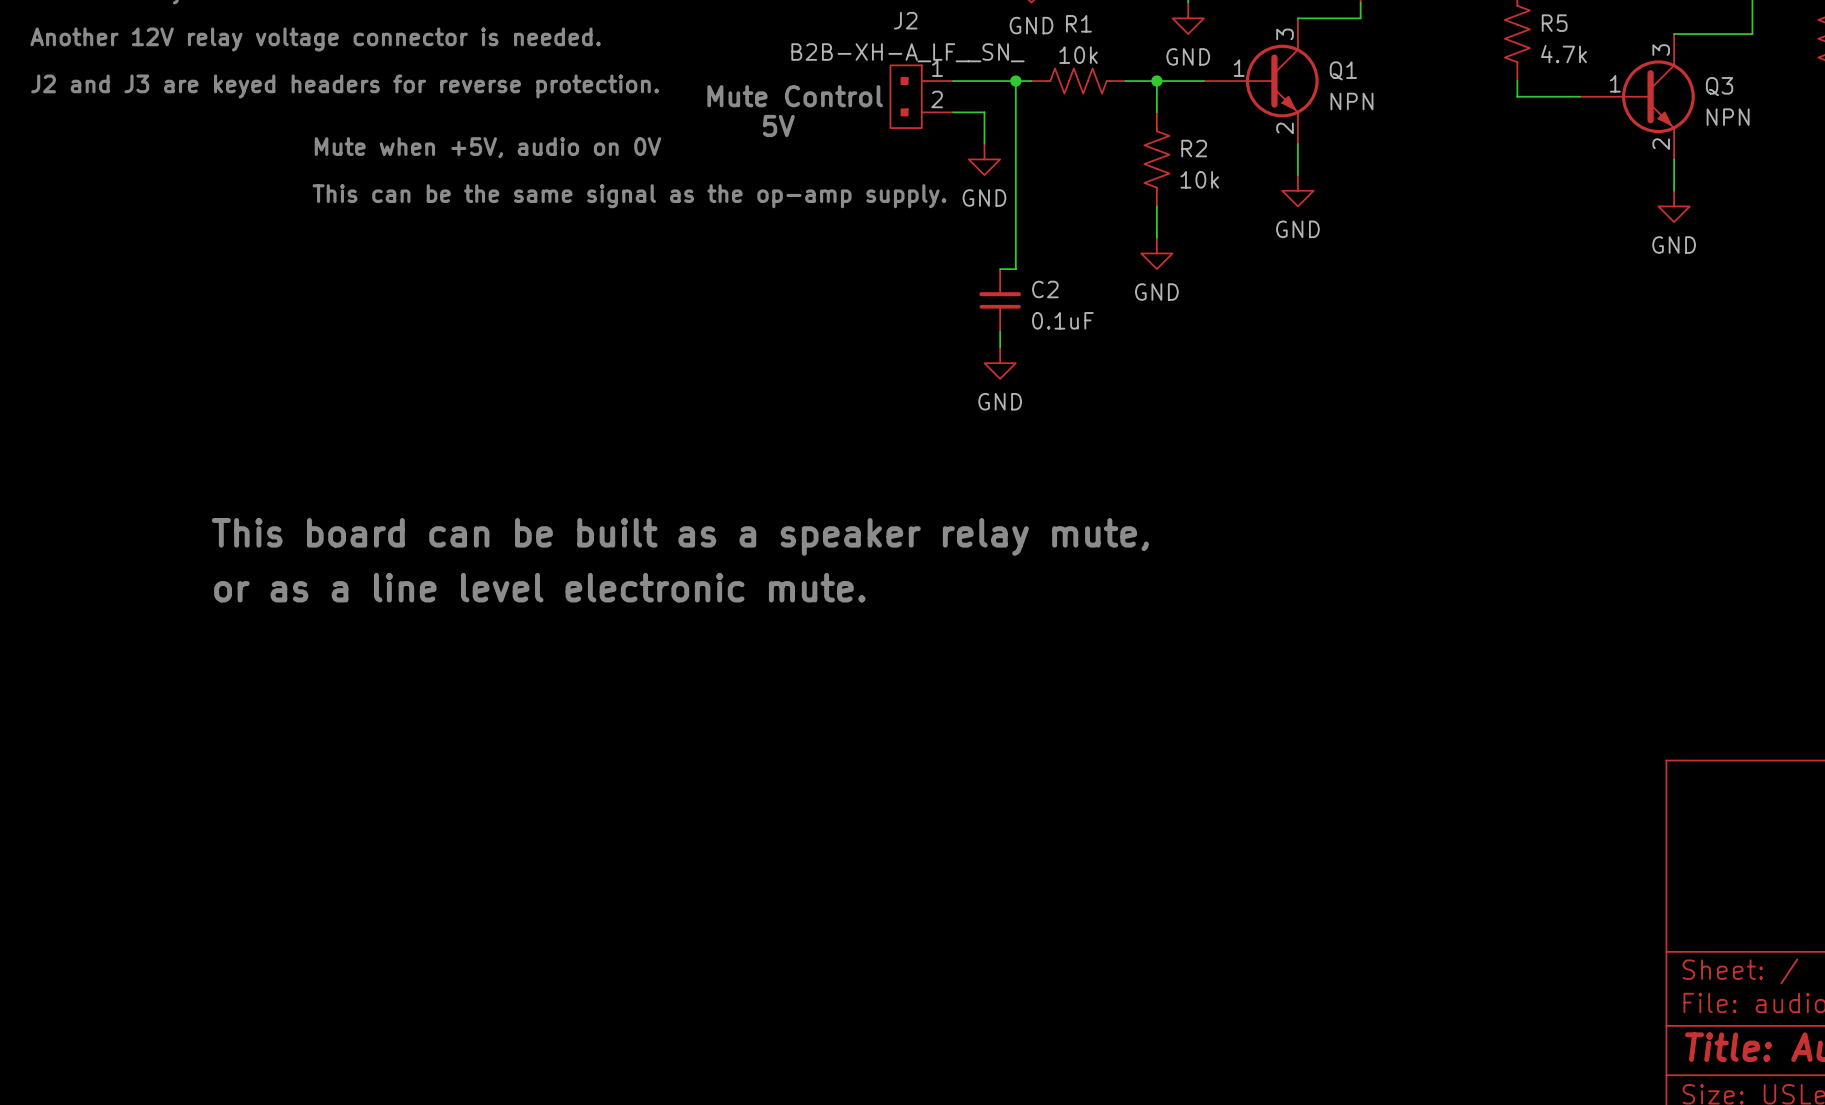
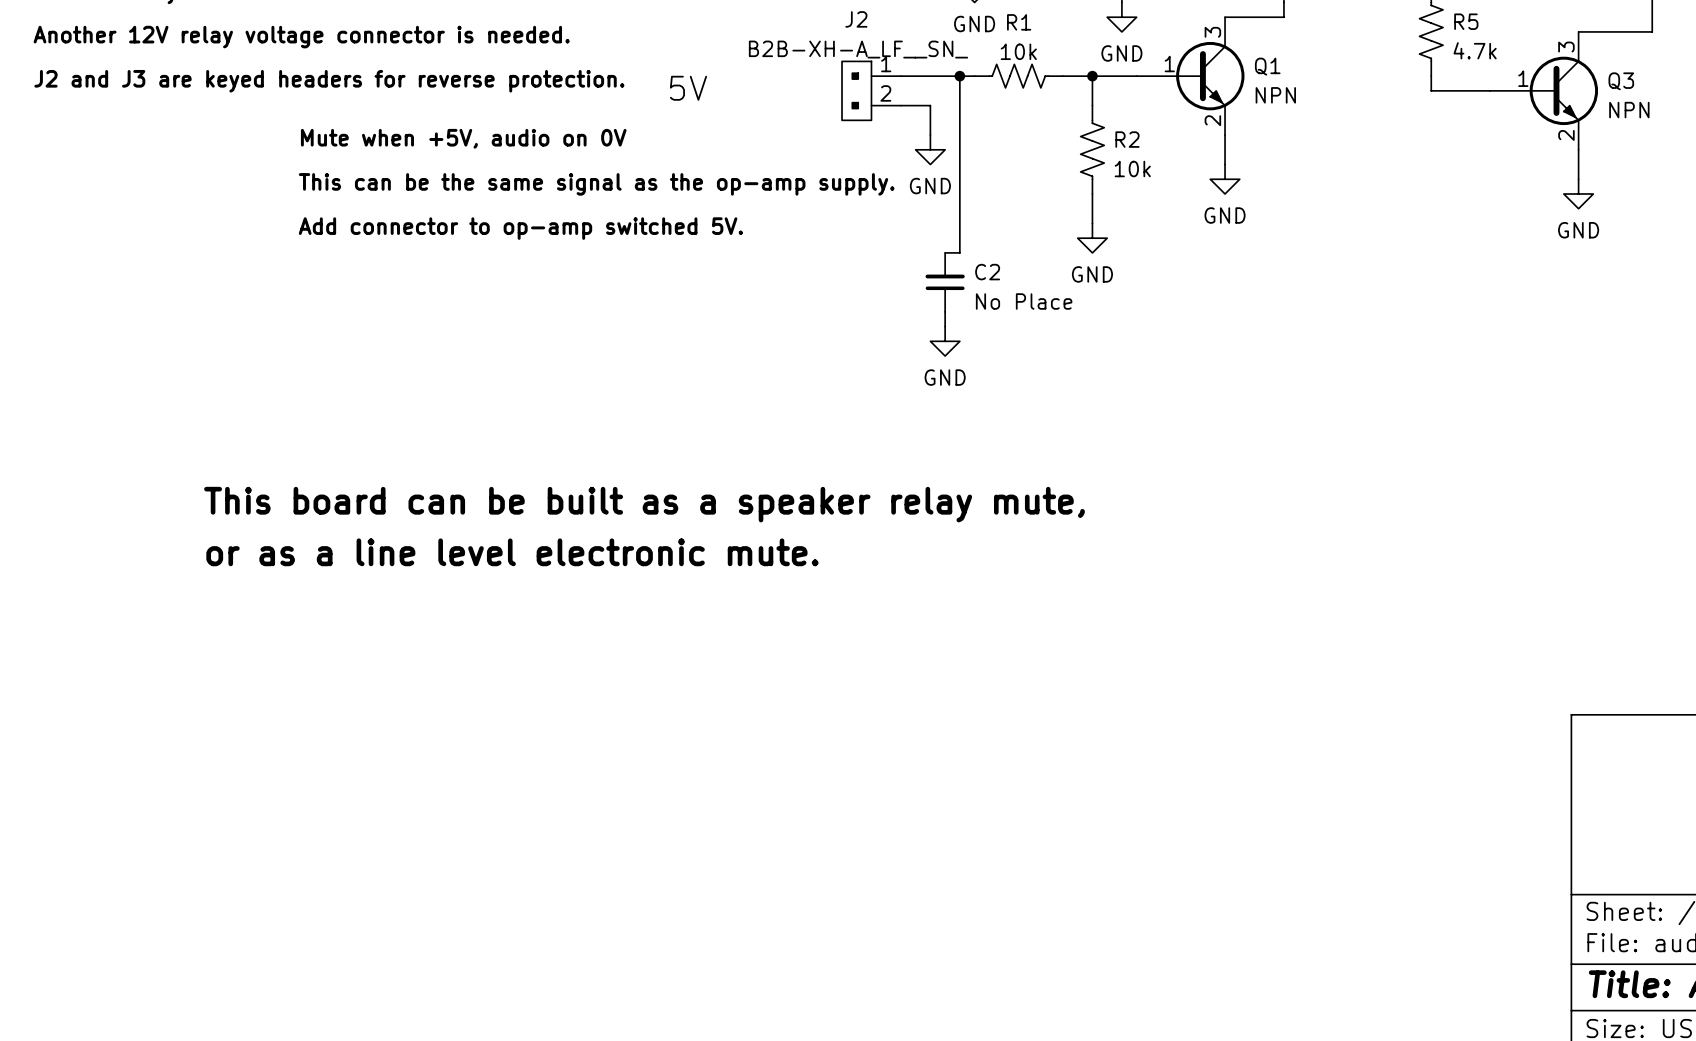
text: Mute Control (795, 96) -> 5V (688, 88)
text: 5V (778, 126) -> none
text: none -> Add connector to op-amp switched 5V. (520, 228)
C2 value: 0.1uF (1062, 320) -> No Place (1024, 301)

